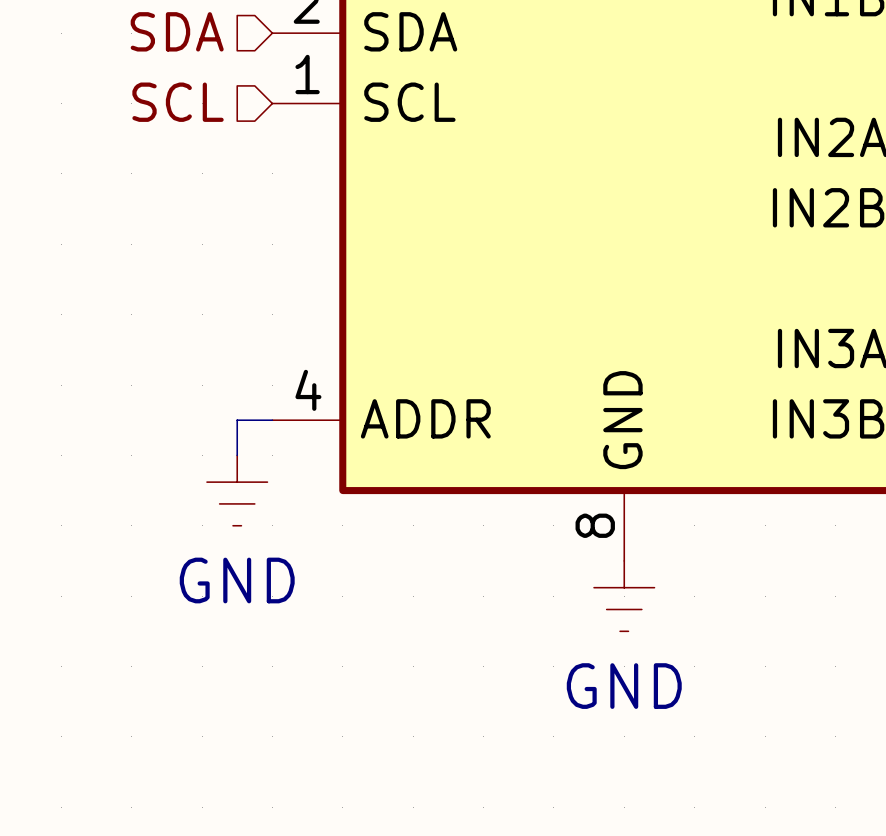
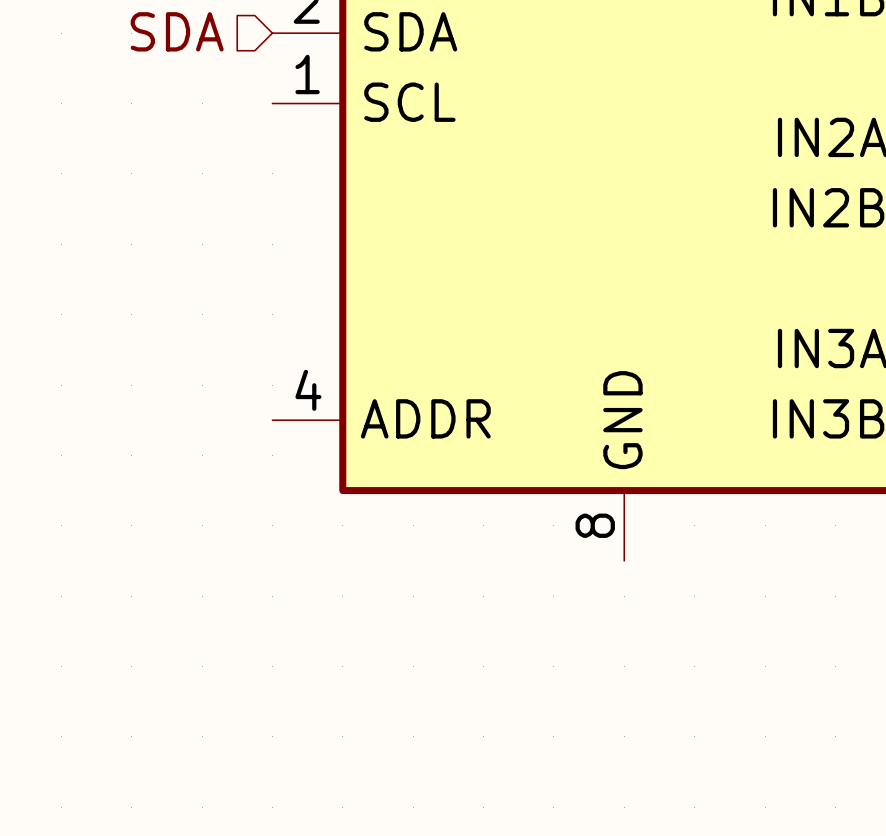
hierarchical label: SCL (178, 102) -> none
wire: (272, 420) (237, 420) (237, 455) -> none
power symbol: GND (237, 490) -> none
power symbol: GND (624, 596) -> none

